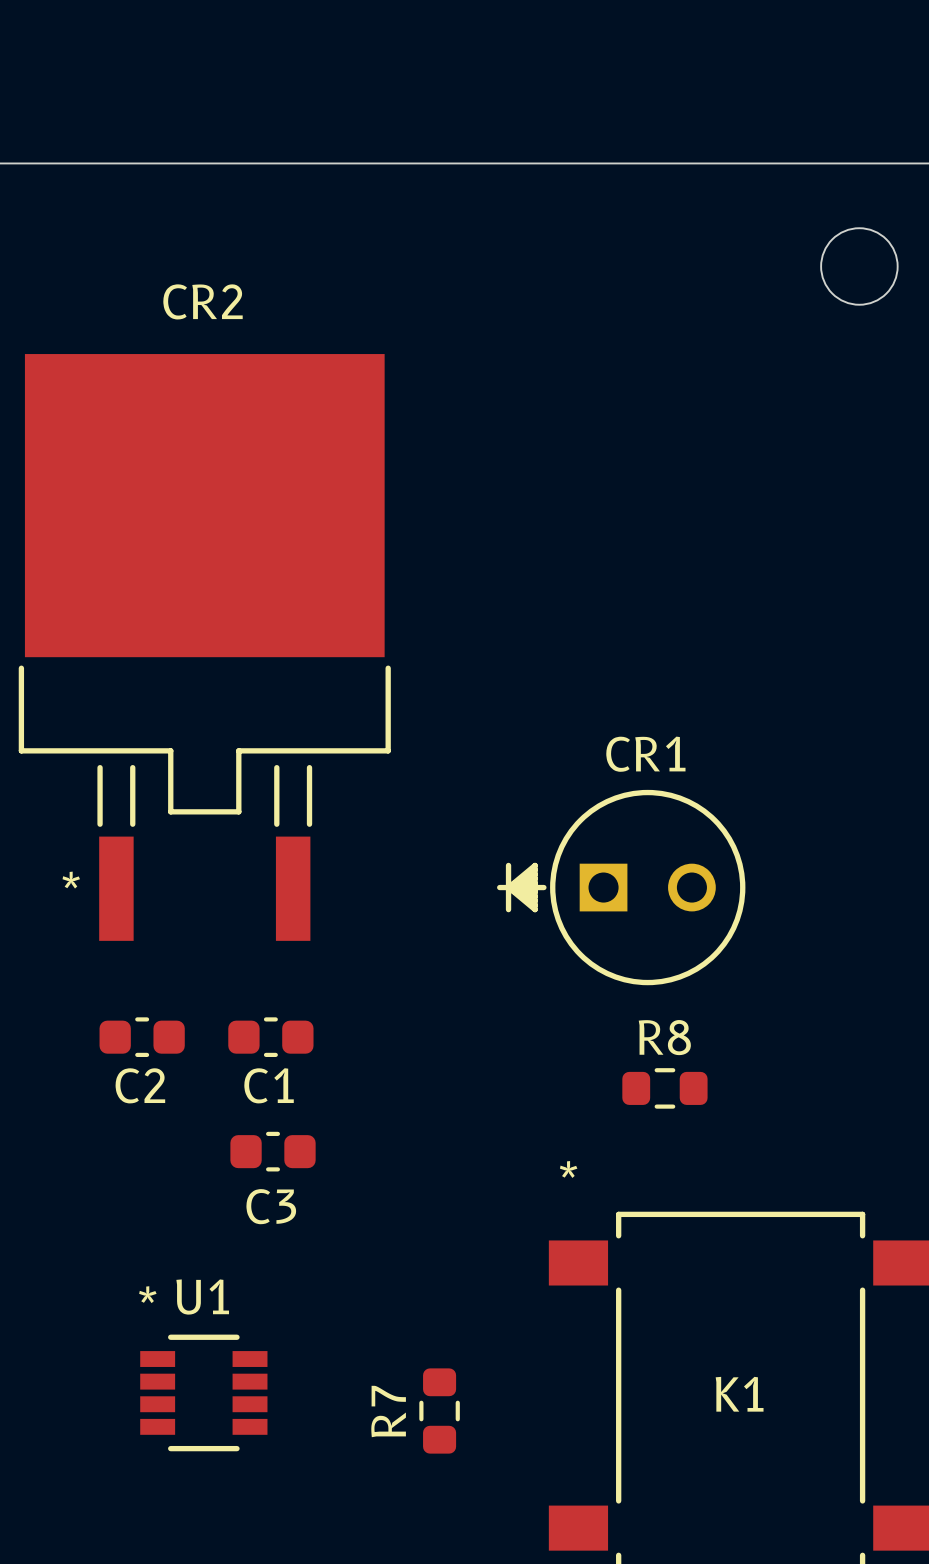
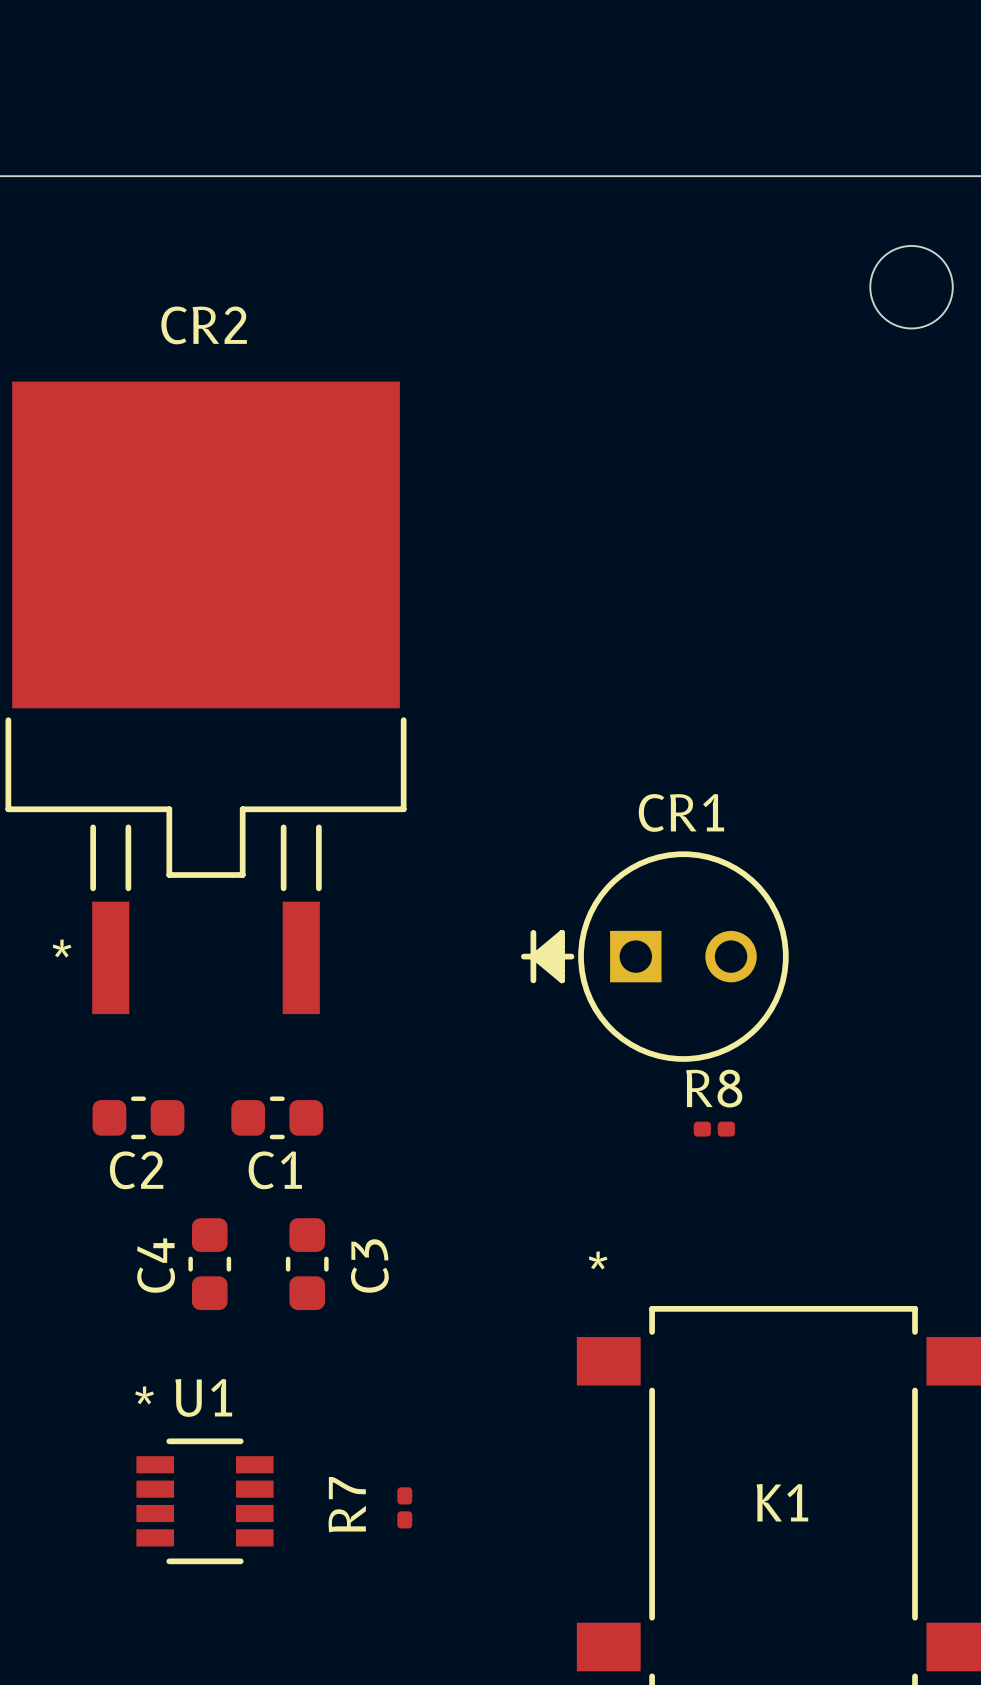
R8 footprint: [622, 1068, 708, 1109] -> [693, 1121, 735, 1137]
C3 rotation: 0° (273, 1151) -> 90° clockwise (307, 1264)
C4: none -> (209, 1264)
C3 name position: C3 (271, 1206) -> C3 (369, 1266)
R7 footprint: [419, 1368, 460, 1454] -> [397, 1487, 413, 1529]

